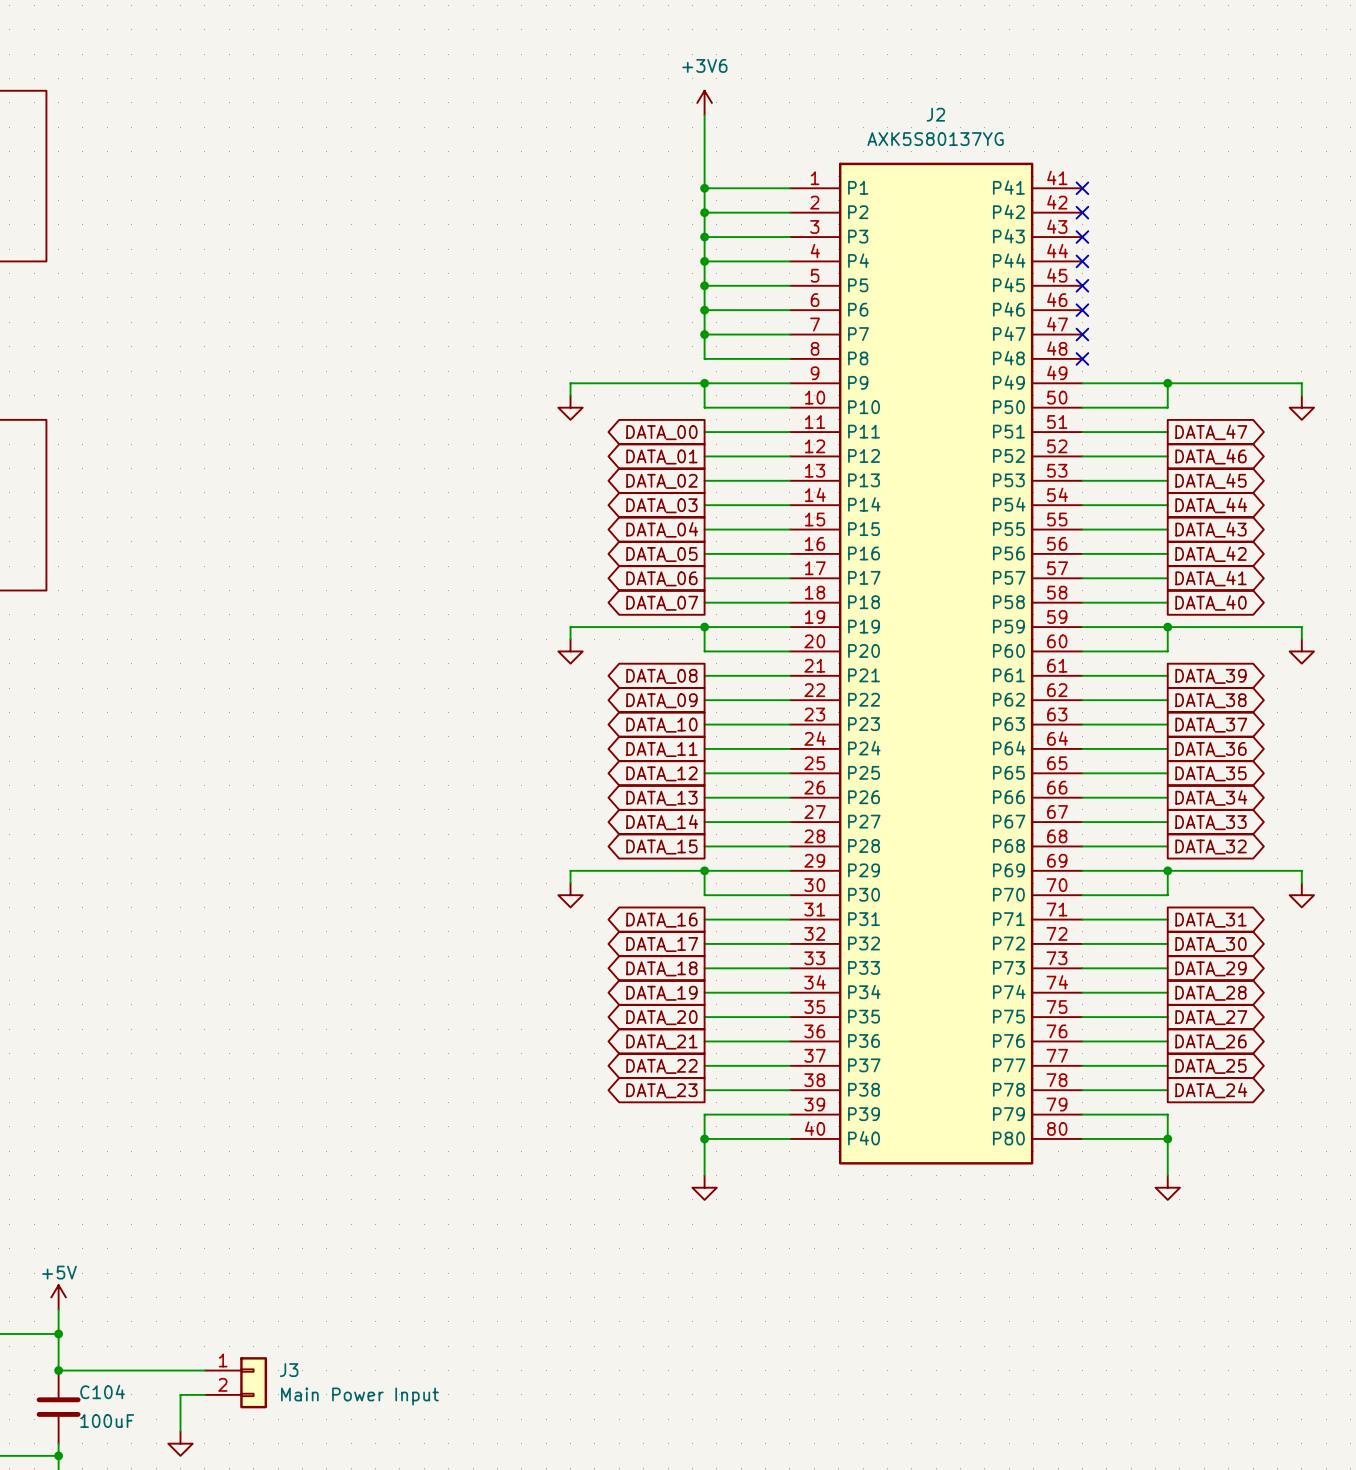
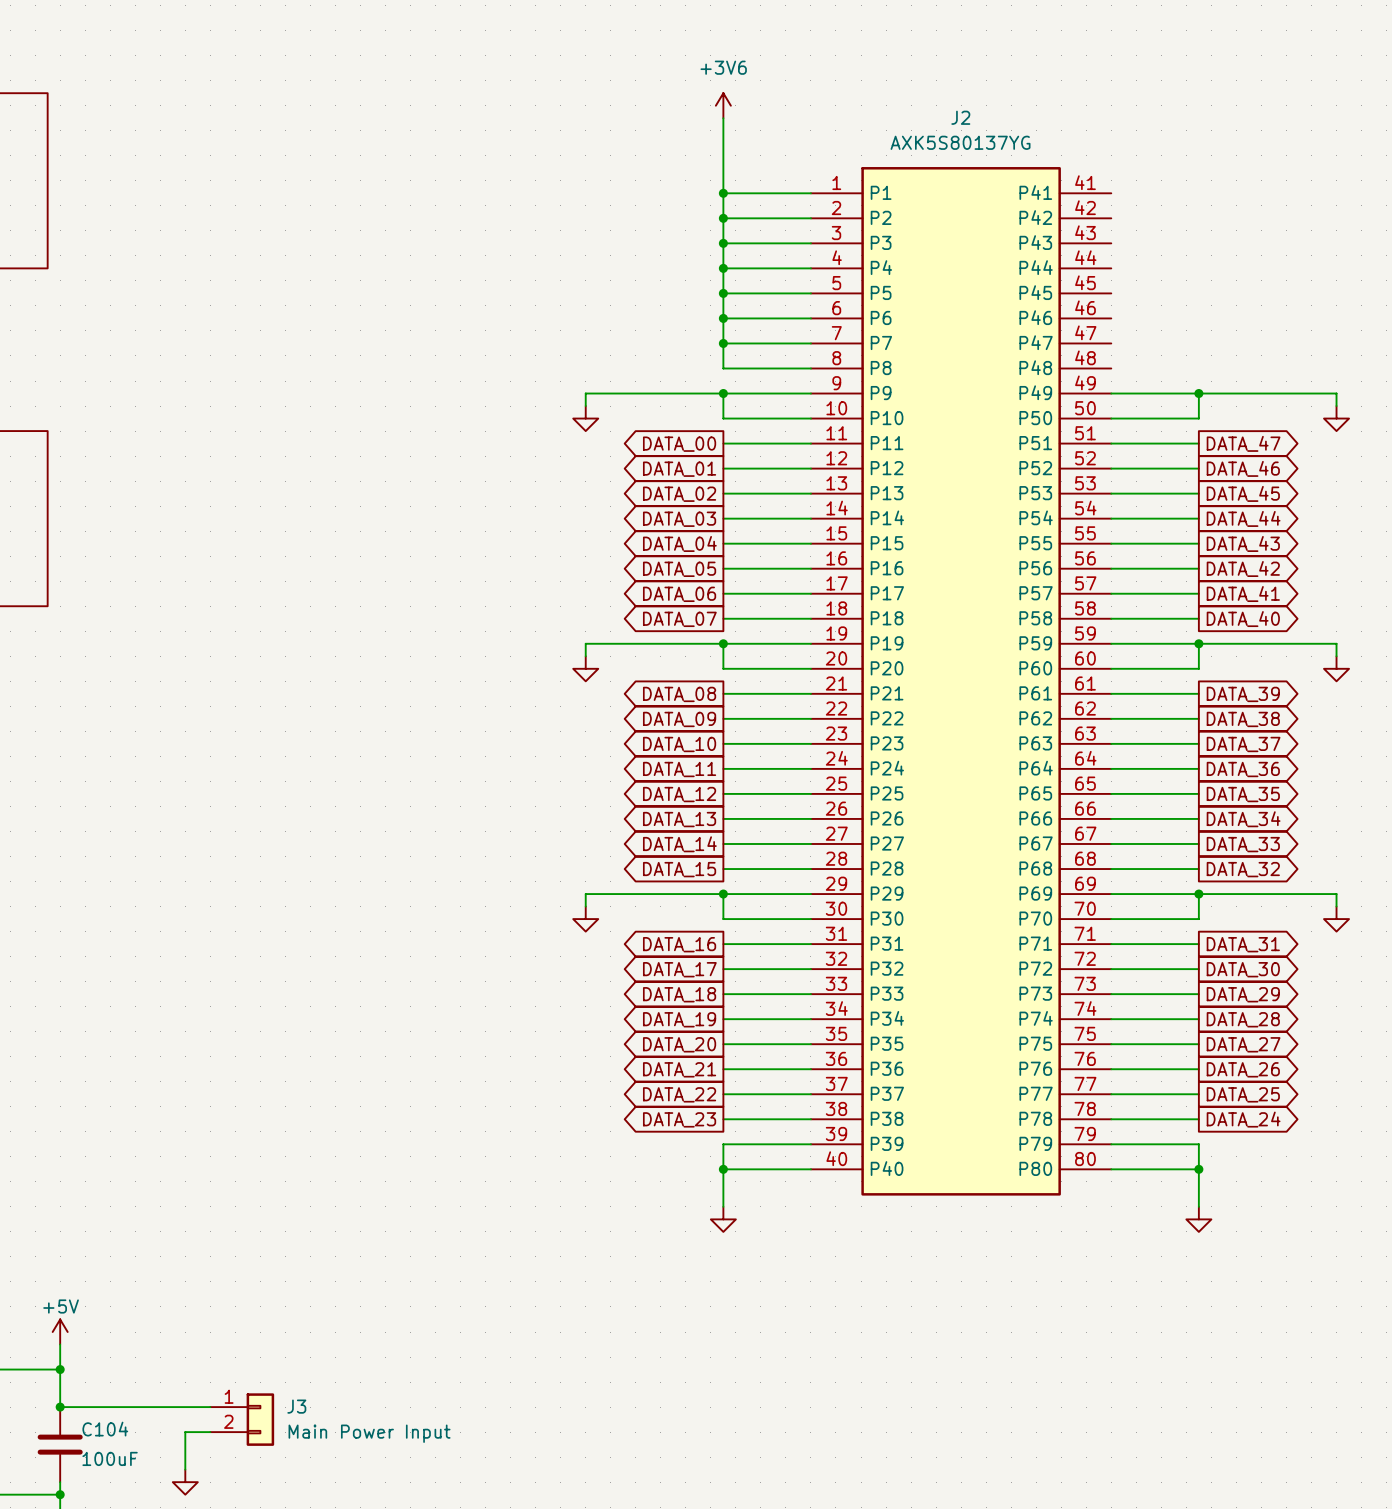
no-connect mark: (1082, 188) -> none
no-connect mark: (1082, 212) -> none
no-connect mark: (1082, 237) -> none
no-connect mark: (1082, 261) -> none
no-connect mark: (1082, 285) -> none
no-connect mark: (1082, 310) -> none
no-connect mark: (1082, 334) -> none
no-connect mark: (1082, 358) -> none

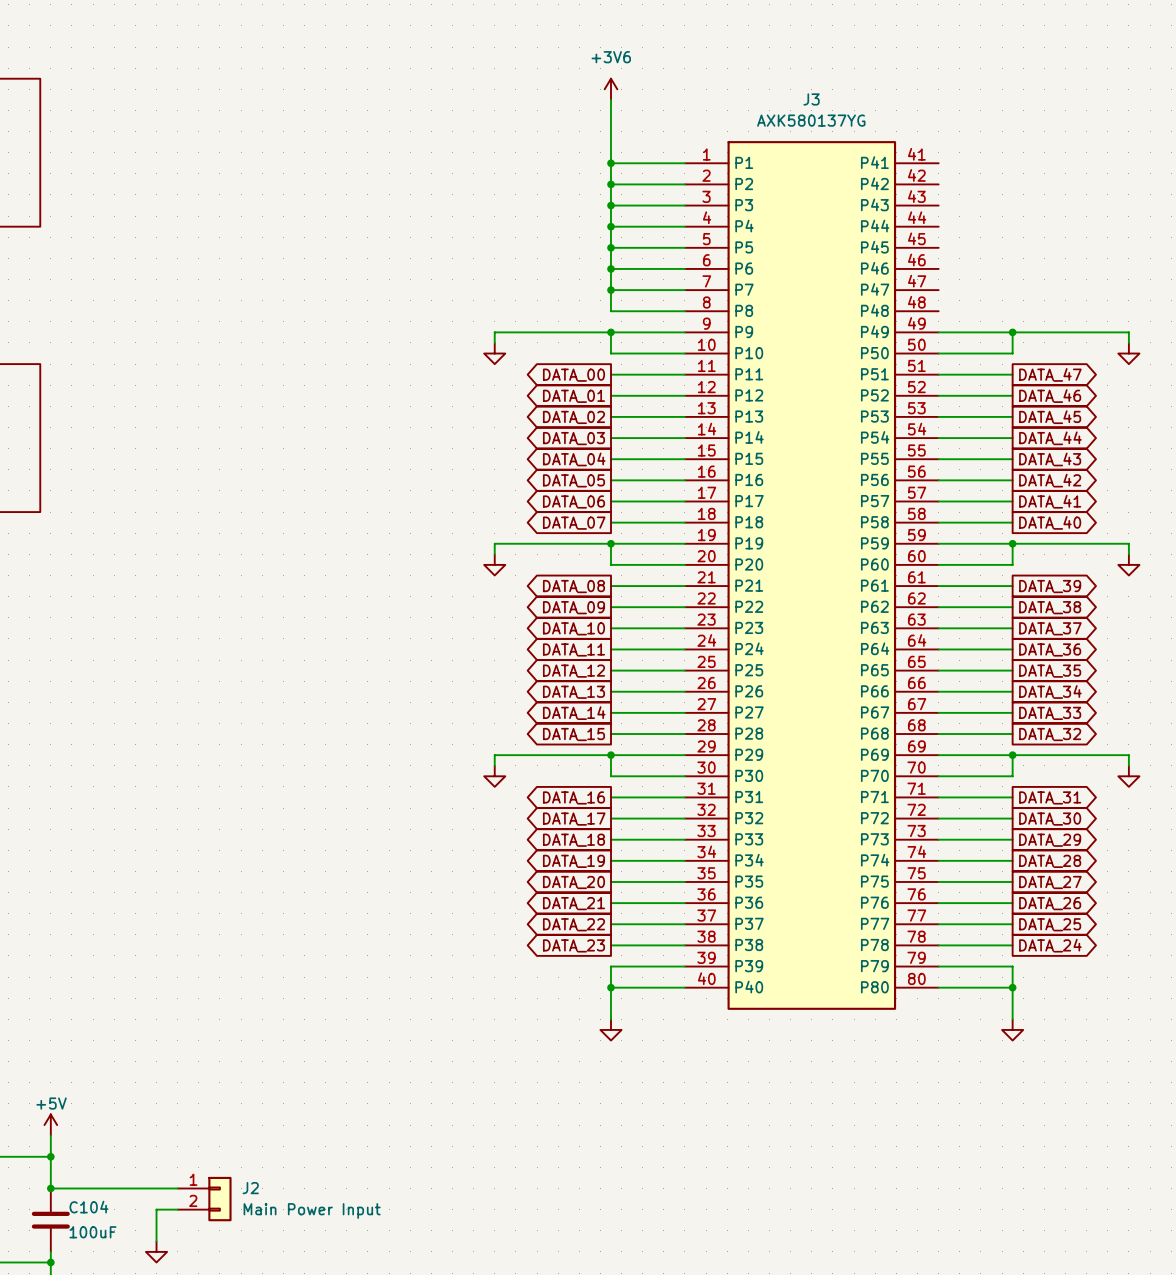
J2 name: J2 (960, 117) -> J3 (811, 99)
J2 value: AXK5S80137YG (960, 142) -> AXK580137YG (811, 120)
J3 name: J3 (296, 1406) -> J2 (250, 1188)

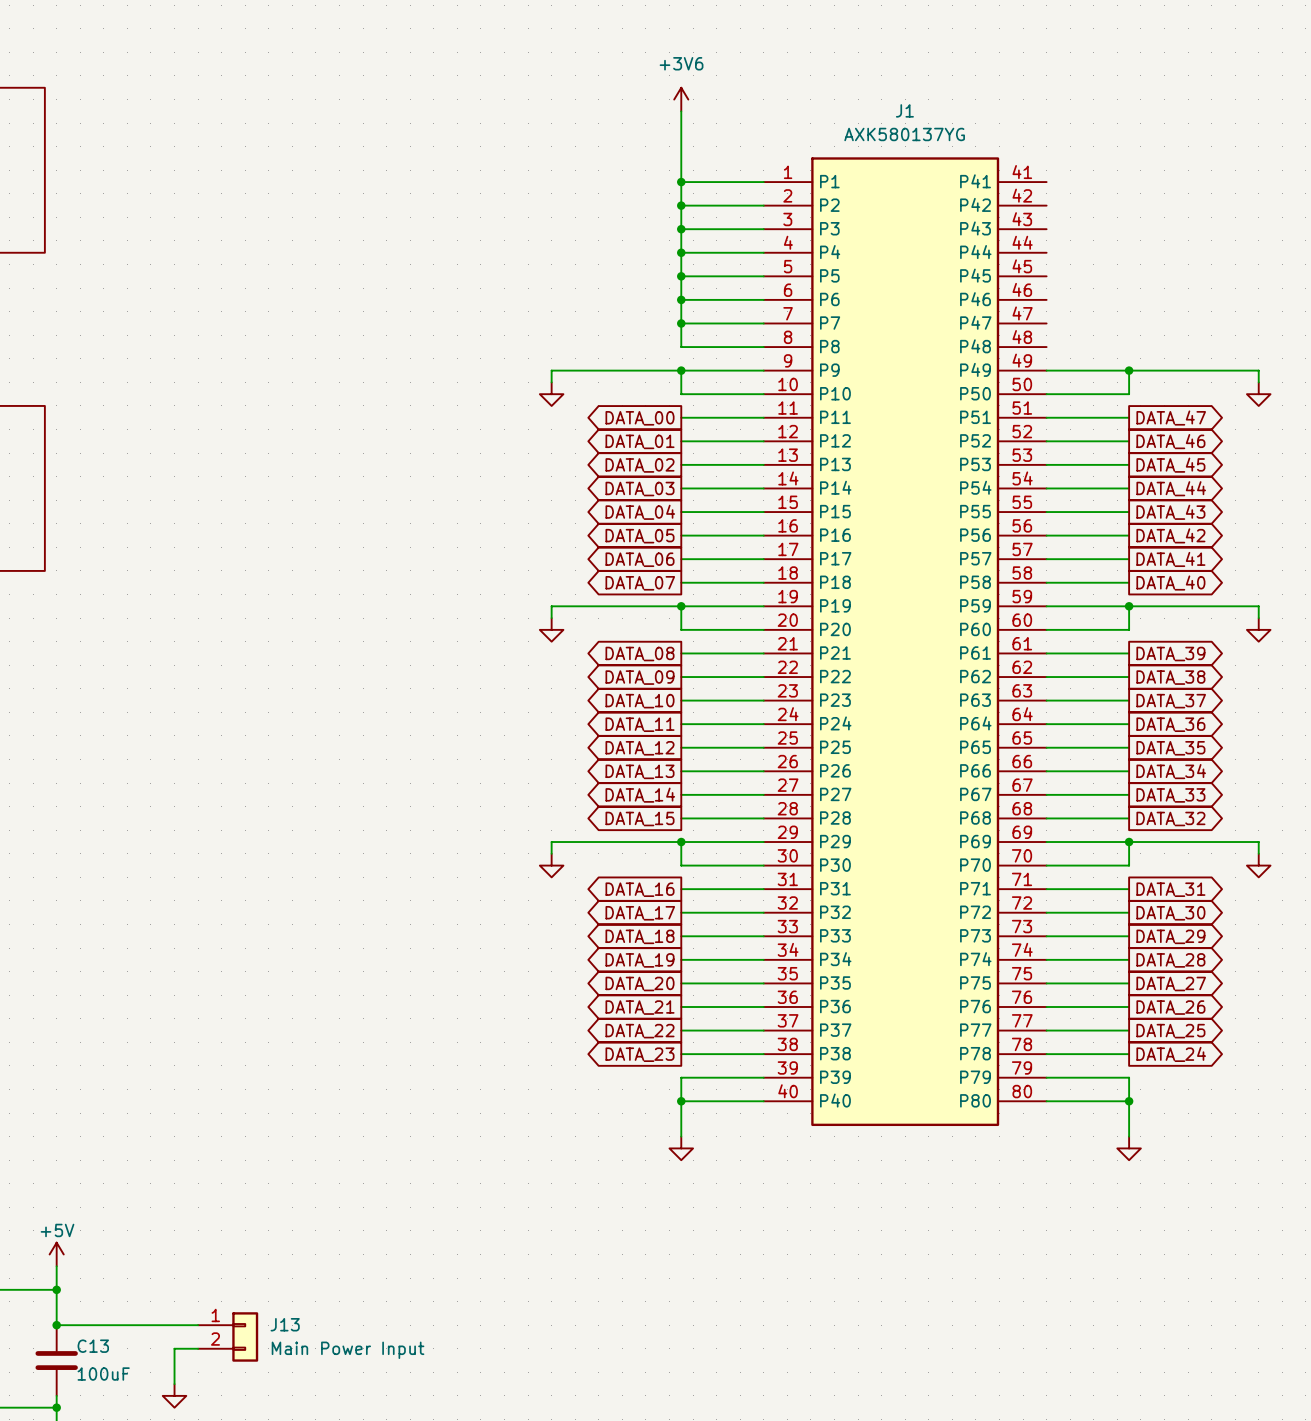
J3 name: J3 (811, 99) -> J1 (904, 110)
J2 name: J2 (250, 1188) -> J13 (285, 1324)
C104 name: C104 (88, 1207) -> C13 (93, 1346)

